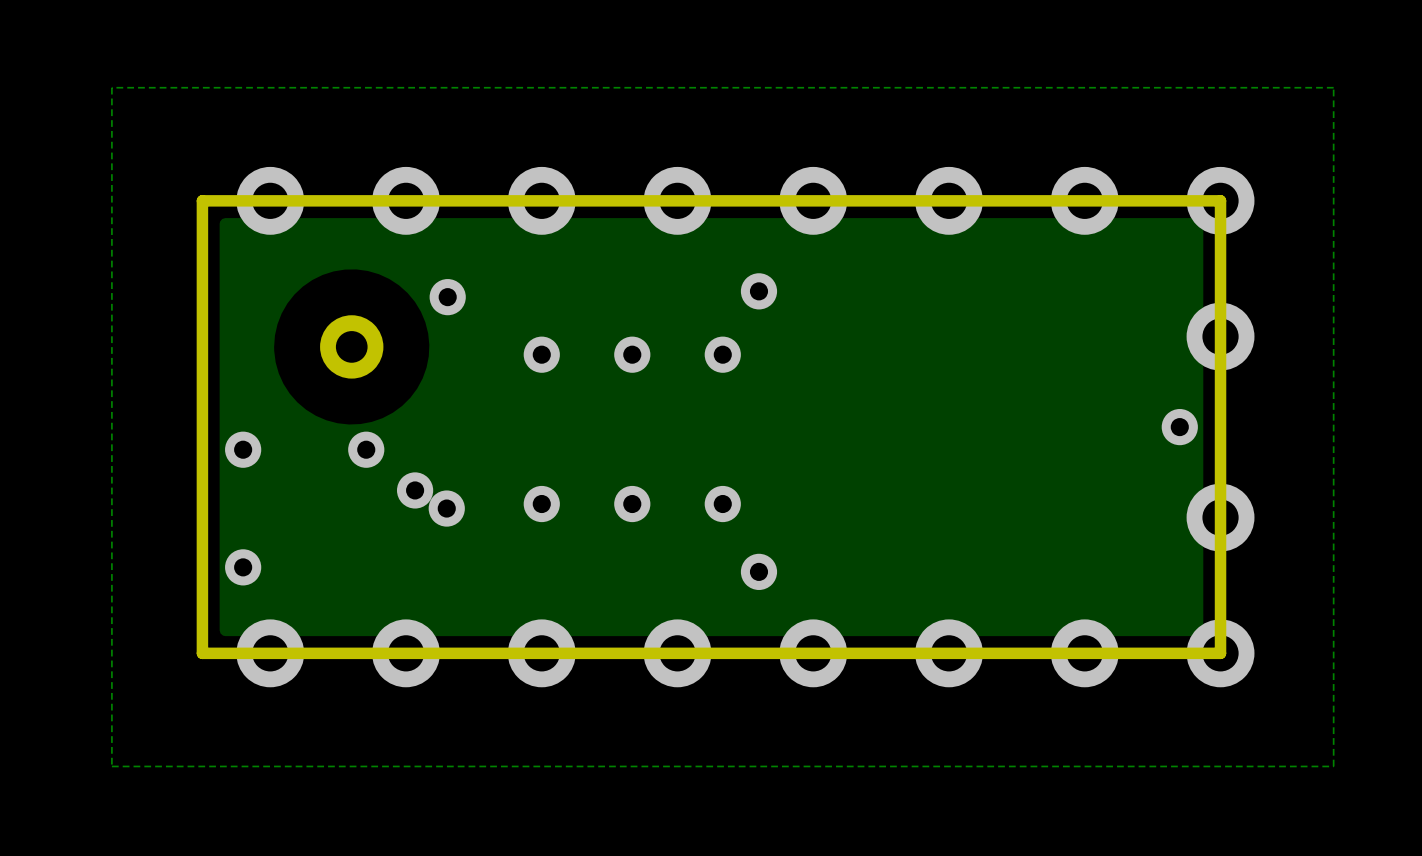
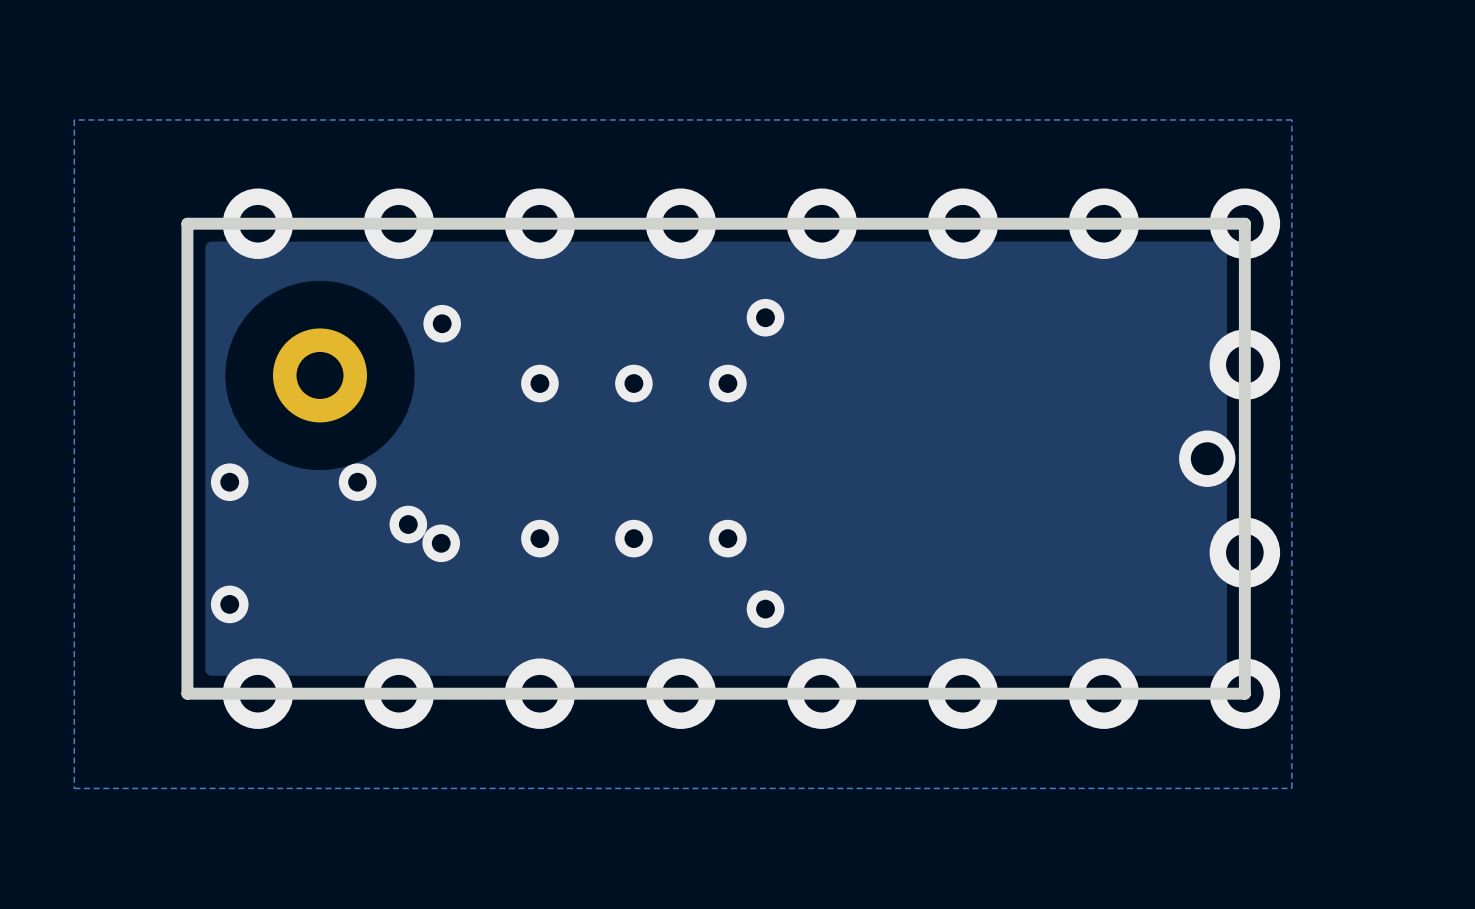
zone outline: (1333, 87) (1333, 766) (111, 766) (111, 87) (1333, 87) -> (1291, 119) (1291, 788) (74, 788) (74, 119) (1291, 119)
part footprint: [320, 315, 384, 379] -> [273, 328, 368, 423]
via size: [1161, 408, 1198, 446] -> [1179, 430, 1236, 487]

